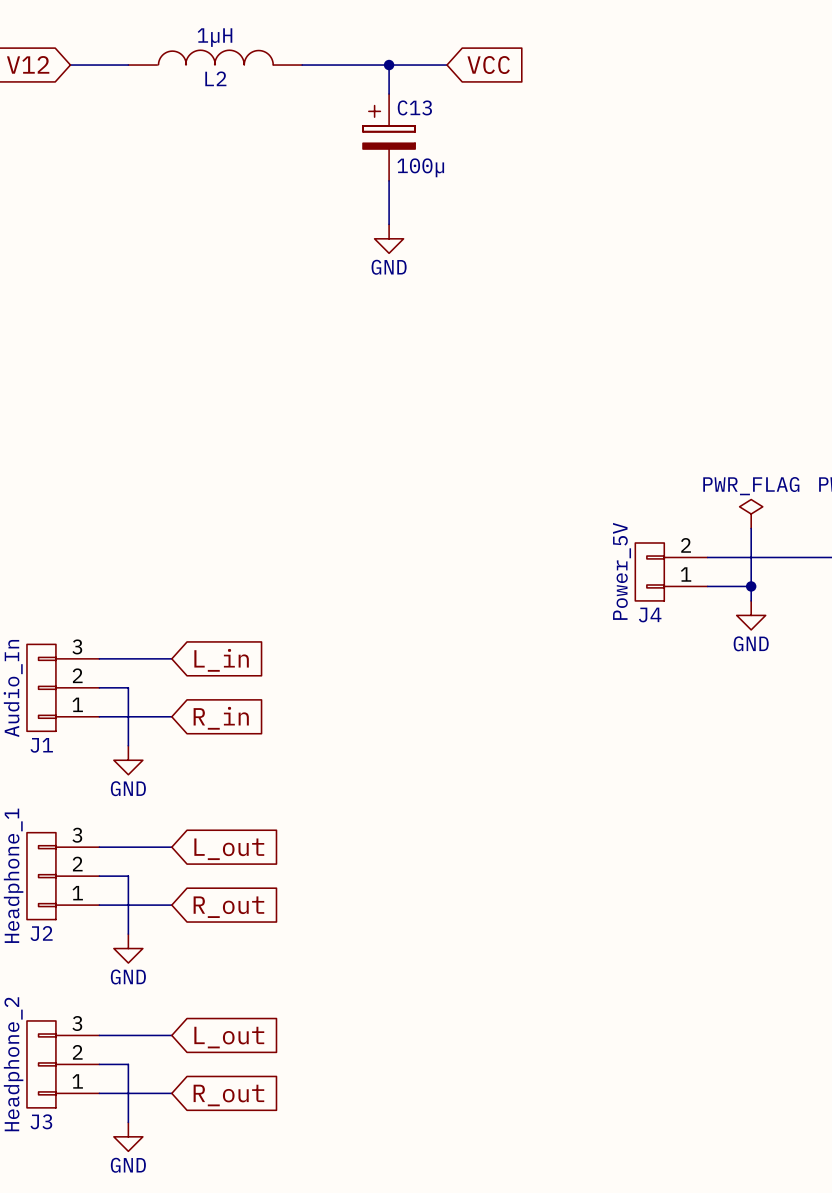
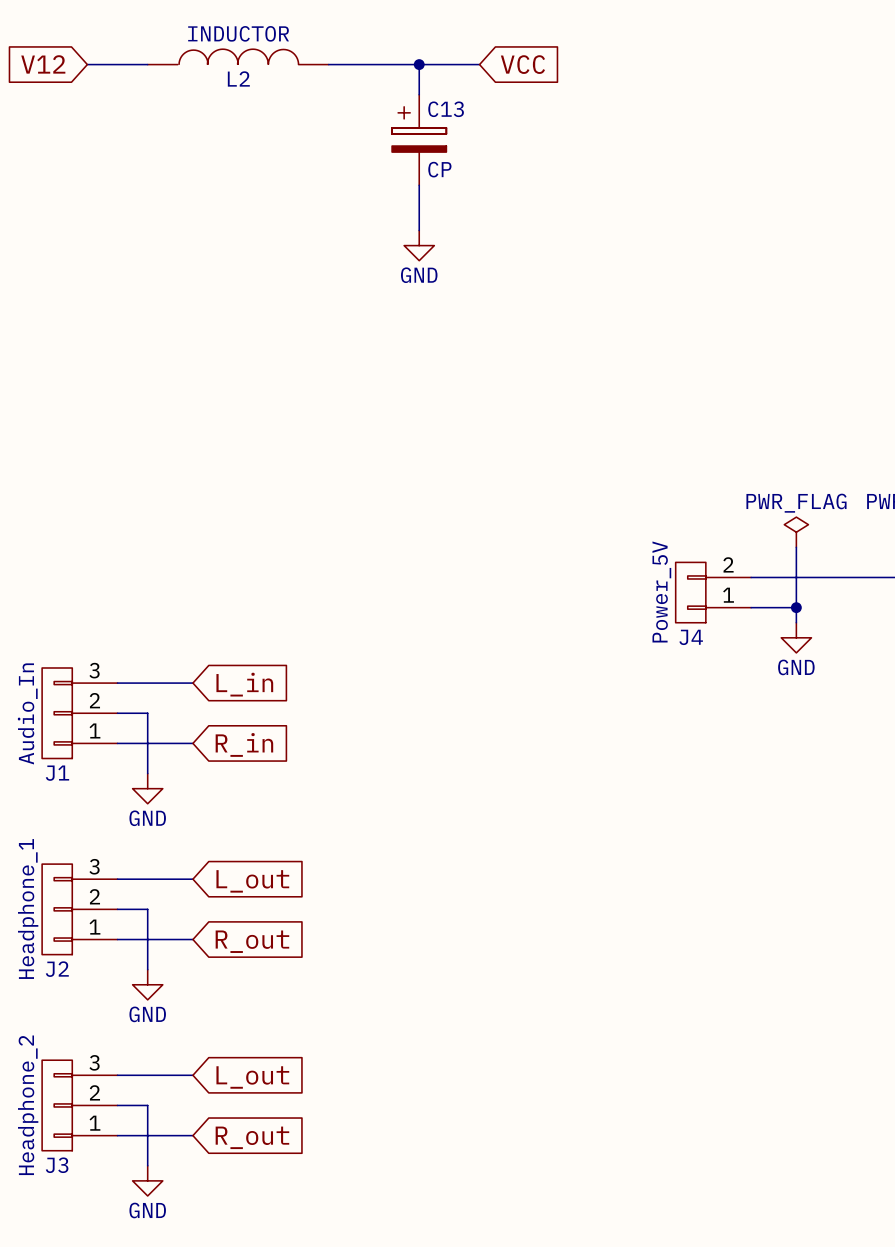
L2 value: 1µH (214, 37) -> INDUCTOR (238, 33)
C13 value: 100µ (420, 167) -> CP (439, 169)

